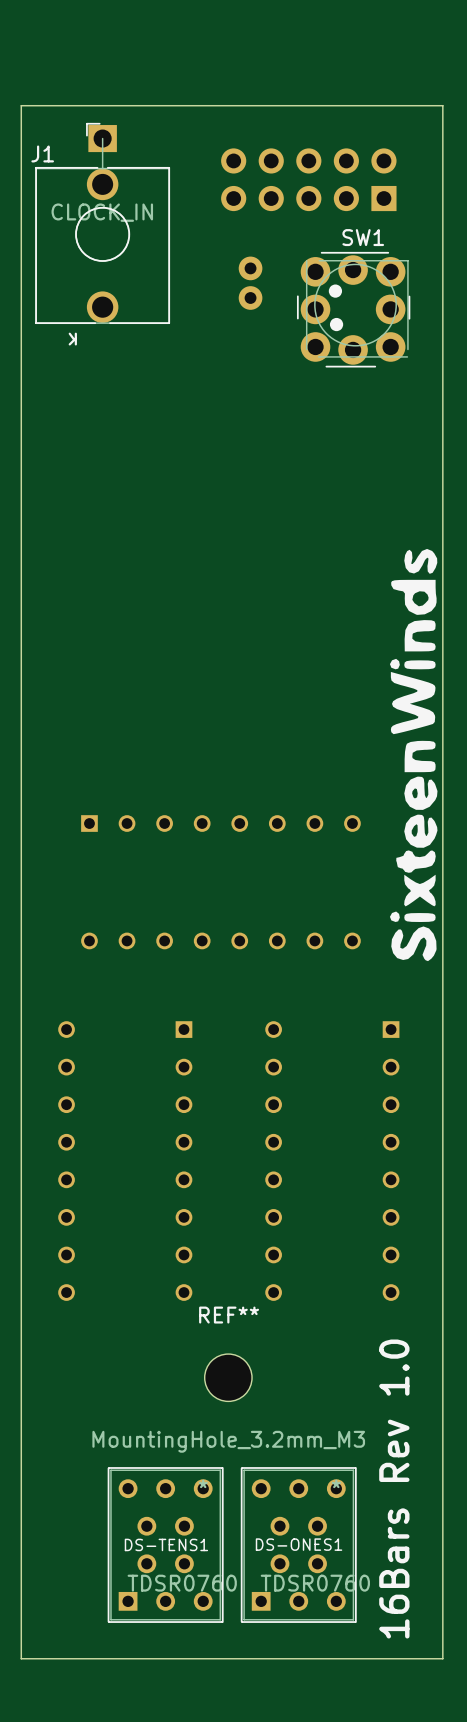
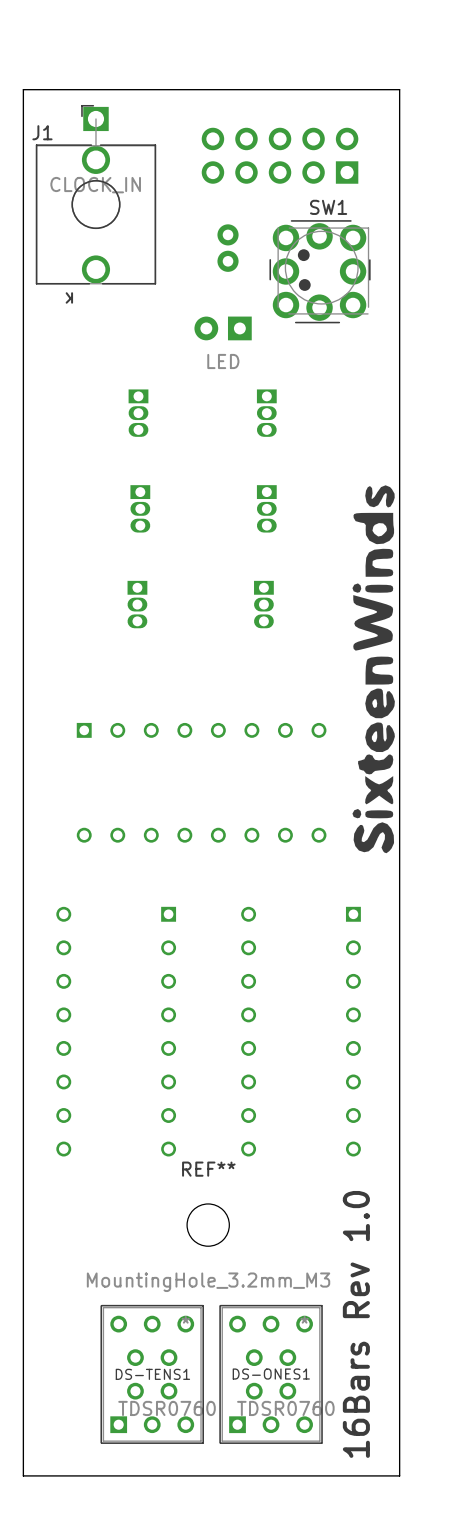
part: none -> LED (223, 328)
part: none -> (138, 413)
part: none -> (266, 413)
part: none -> (140, 508)
part: none -> (266, 508)
part: none -> (137, 604)
part: none -> (263, 604)

